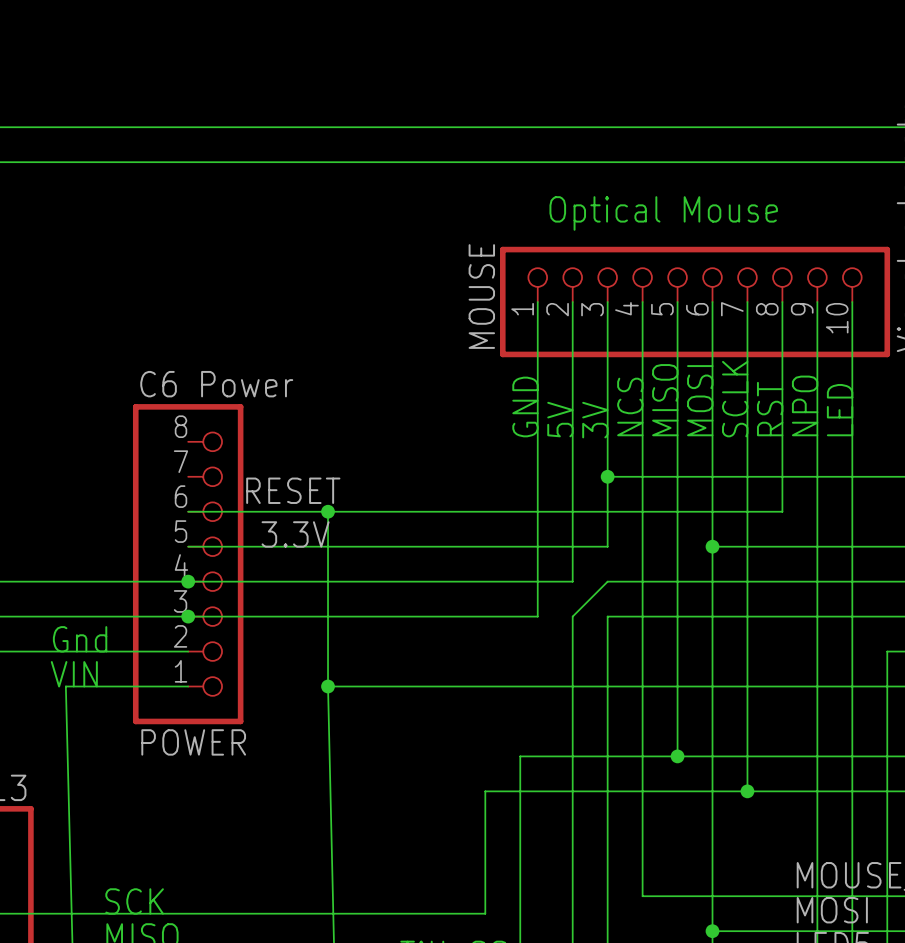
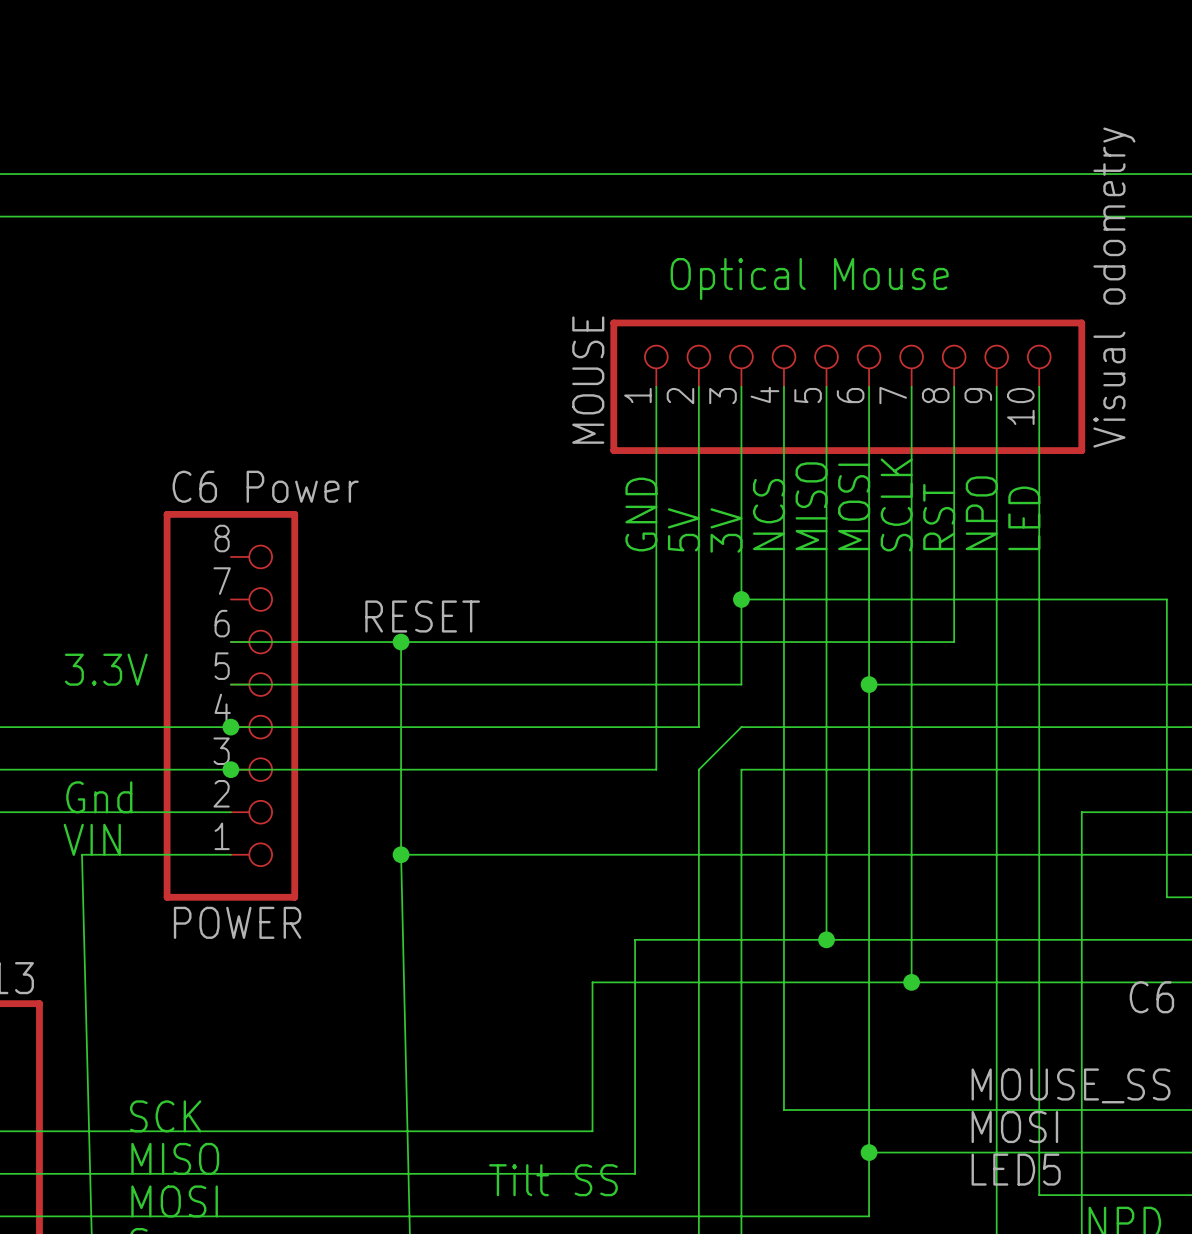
label position: RESET (293, 490) -> RESET (422, 616)
text: none -> 3.3V (106, 669)
label: 3.3V (295, 534) -> none

